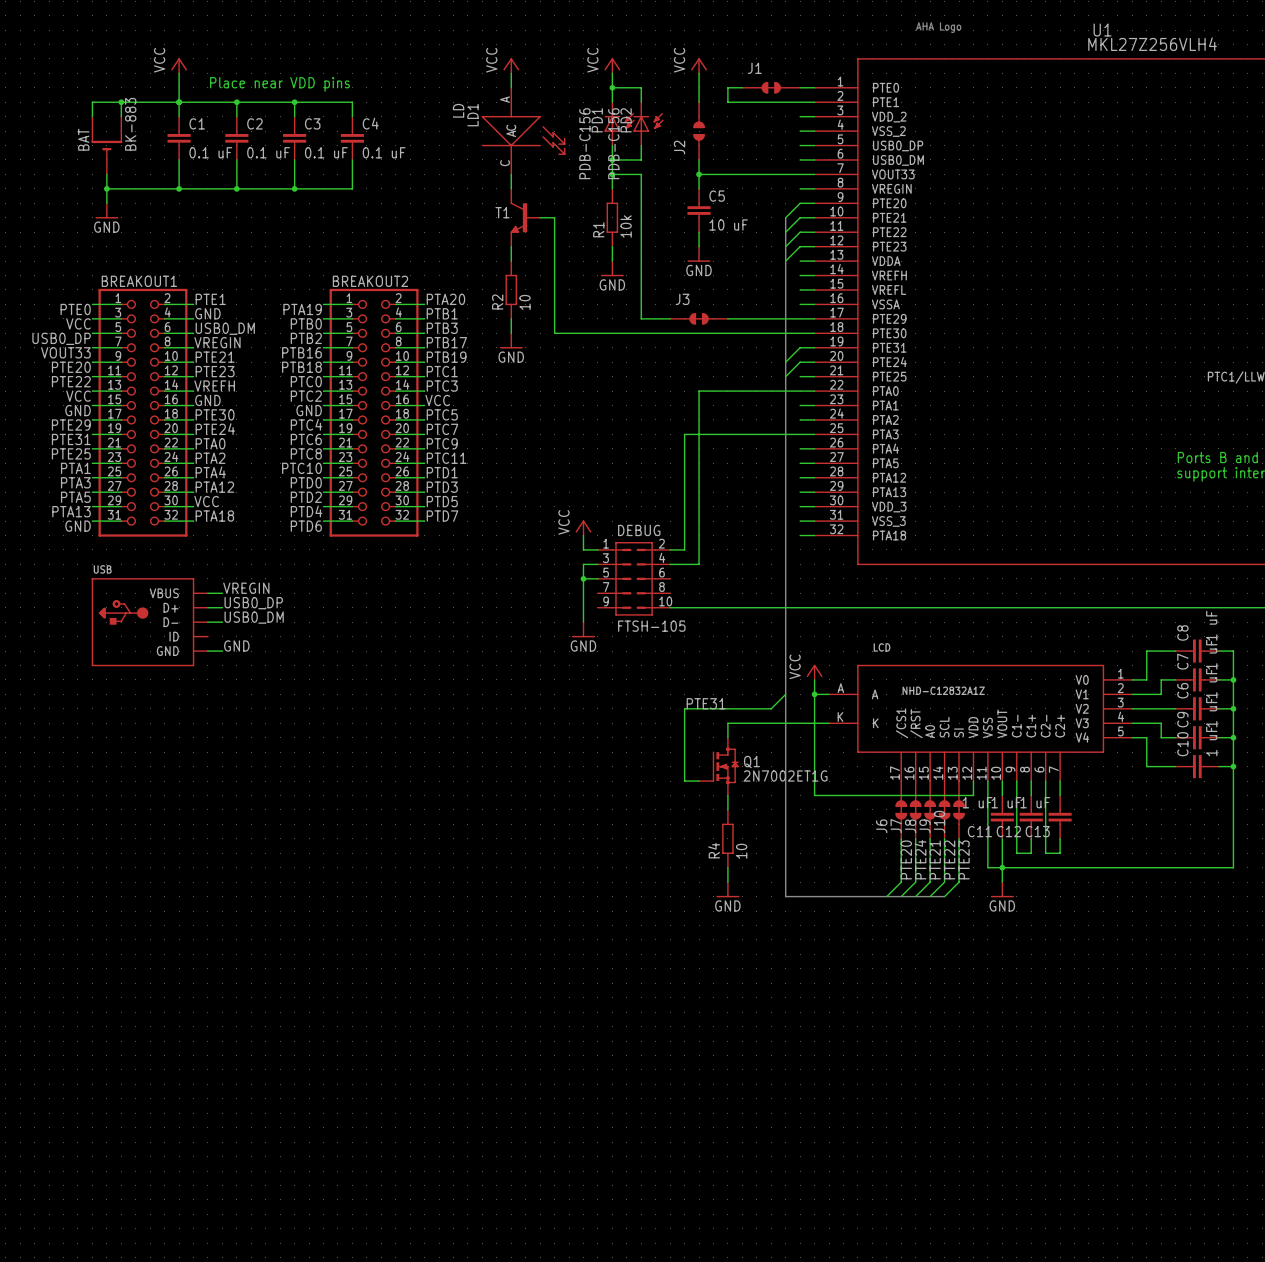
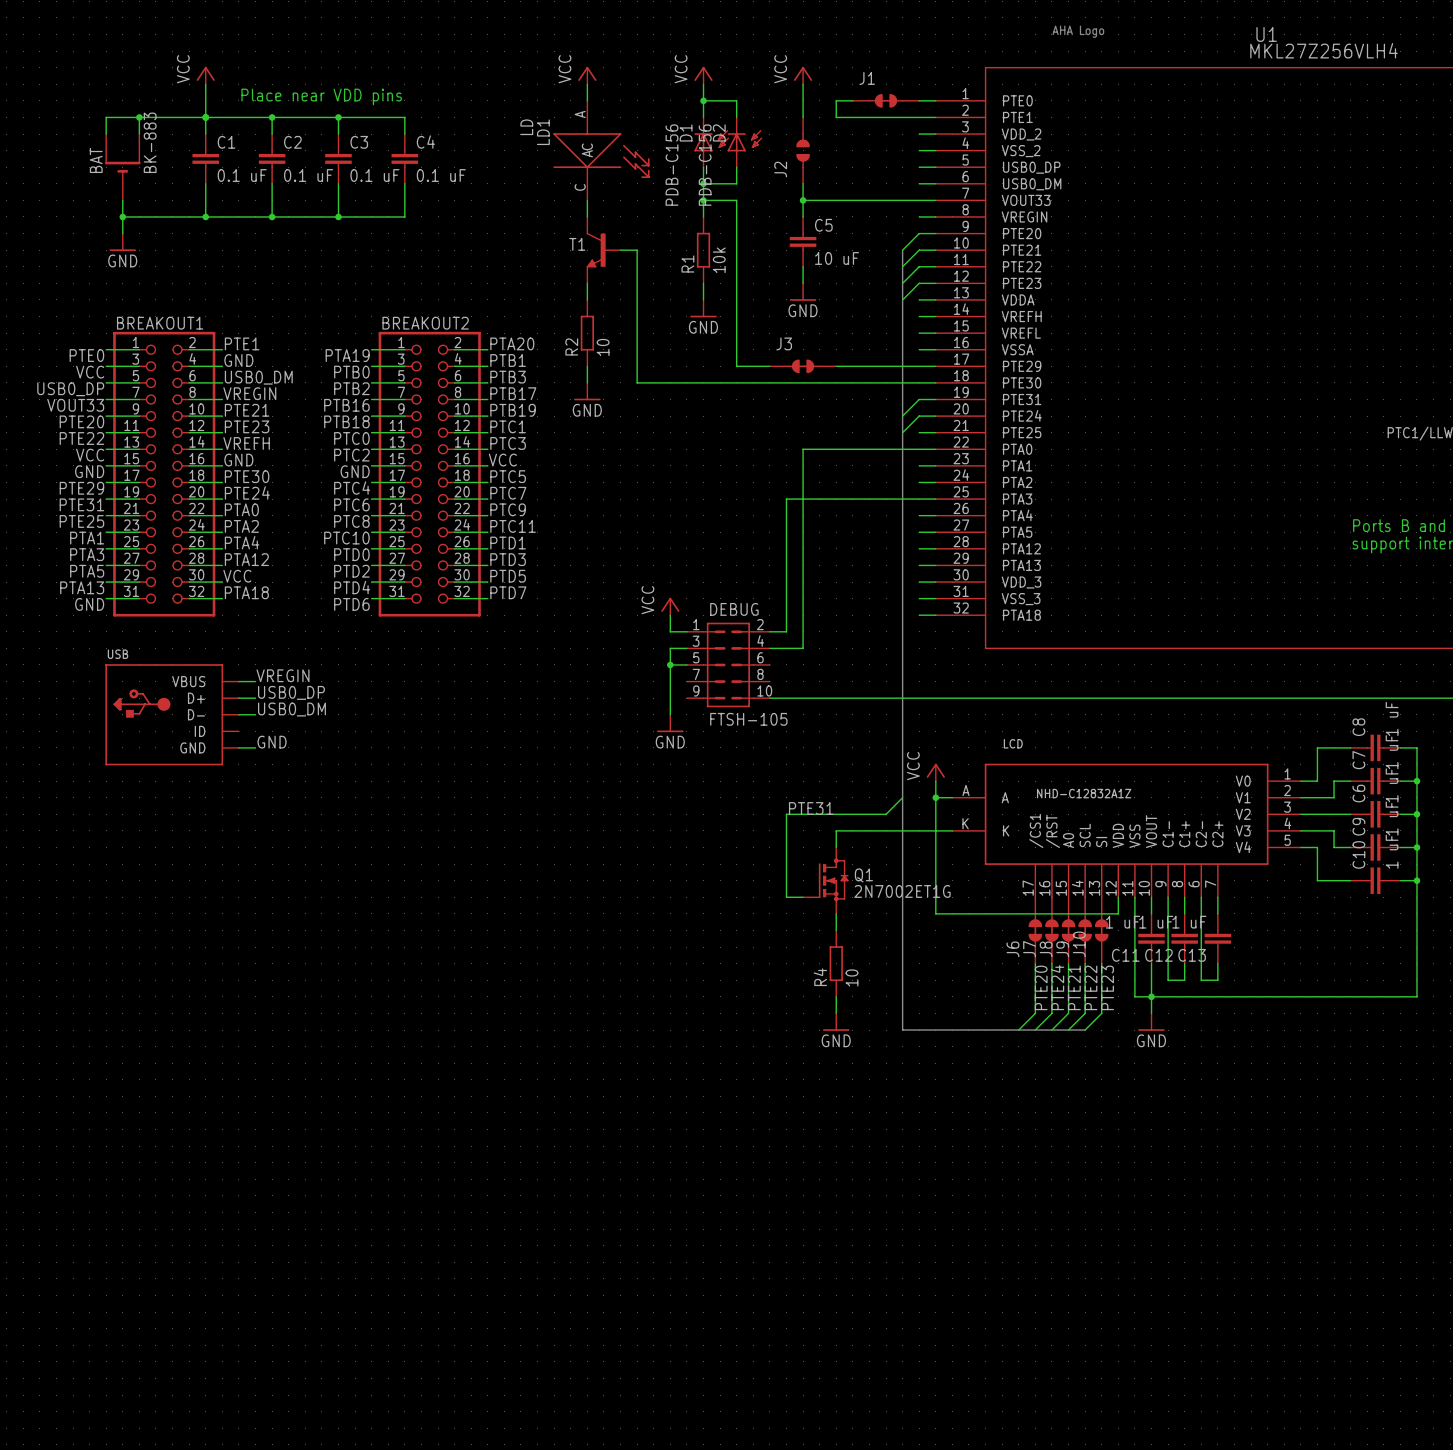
PD1 name: PD1 (597, 120) -> D1 (686, 132)
PD2 name: PD2 (626, 120) -> D2 (719, 132)

